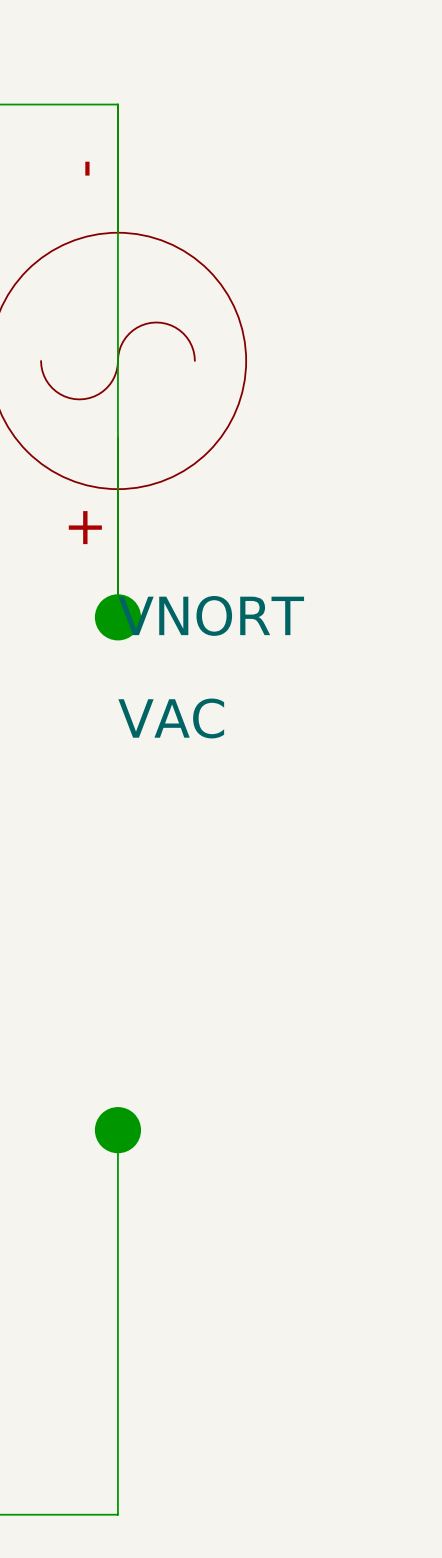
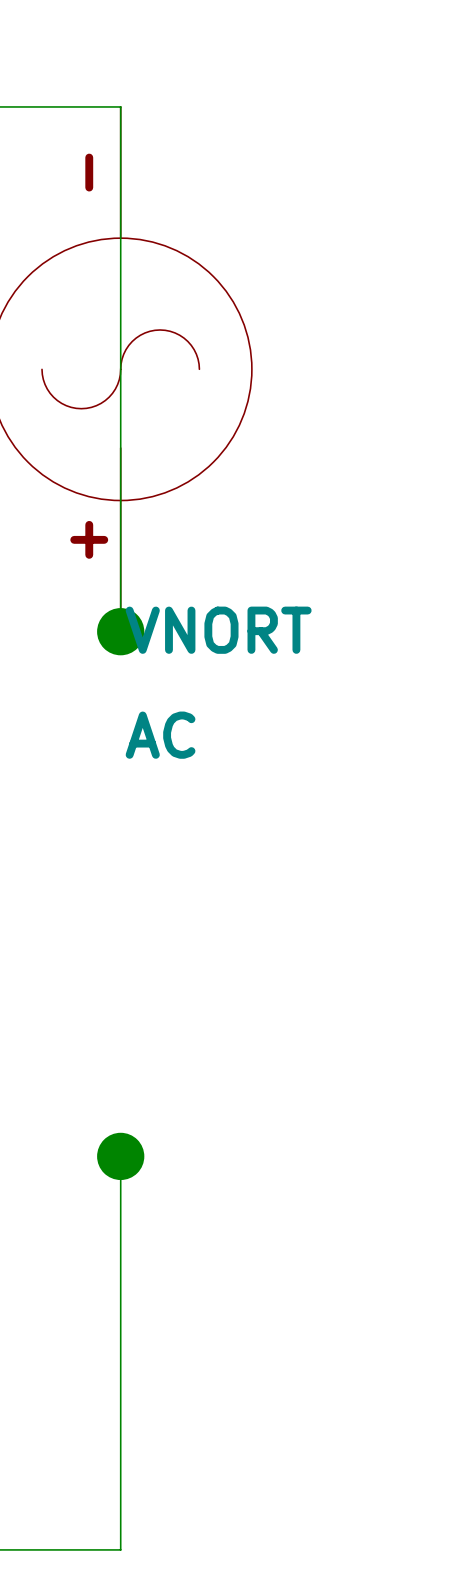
VNORT value: VAC (171, 718) -> AC (160, 735)

